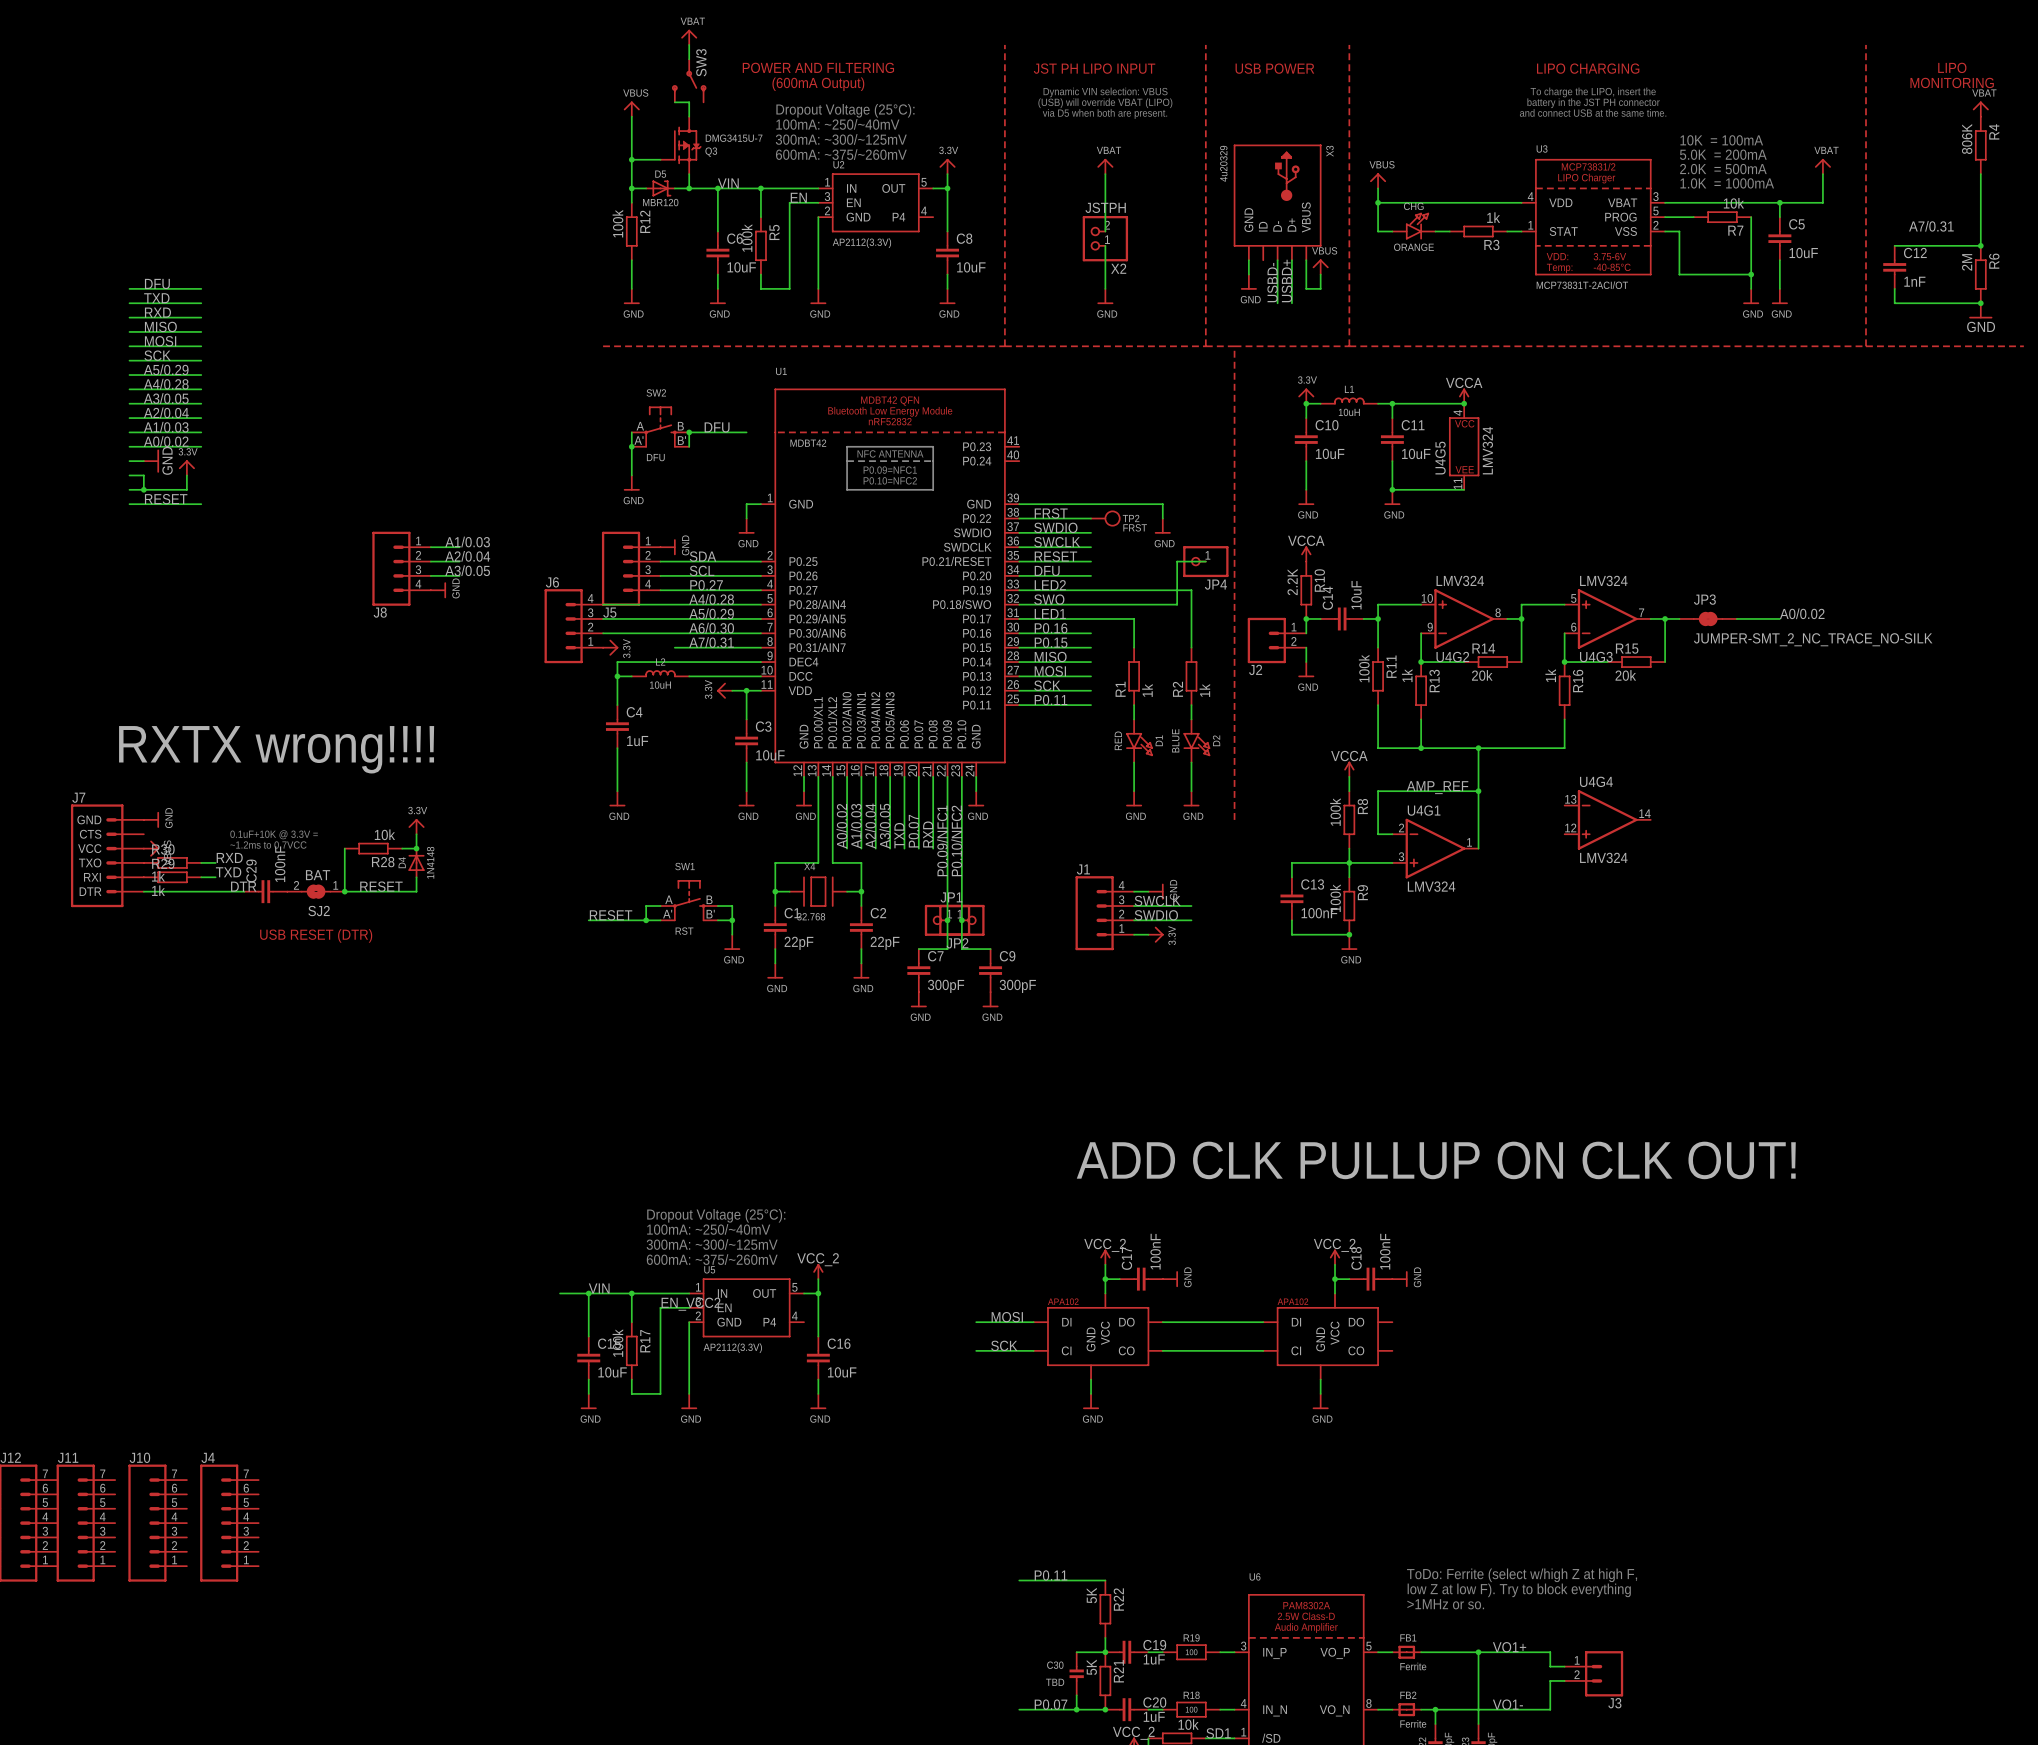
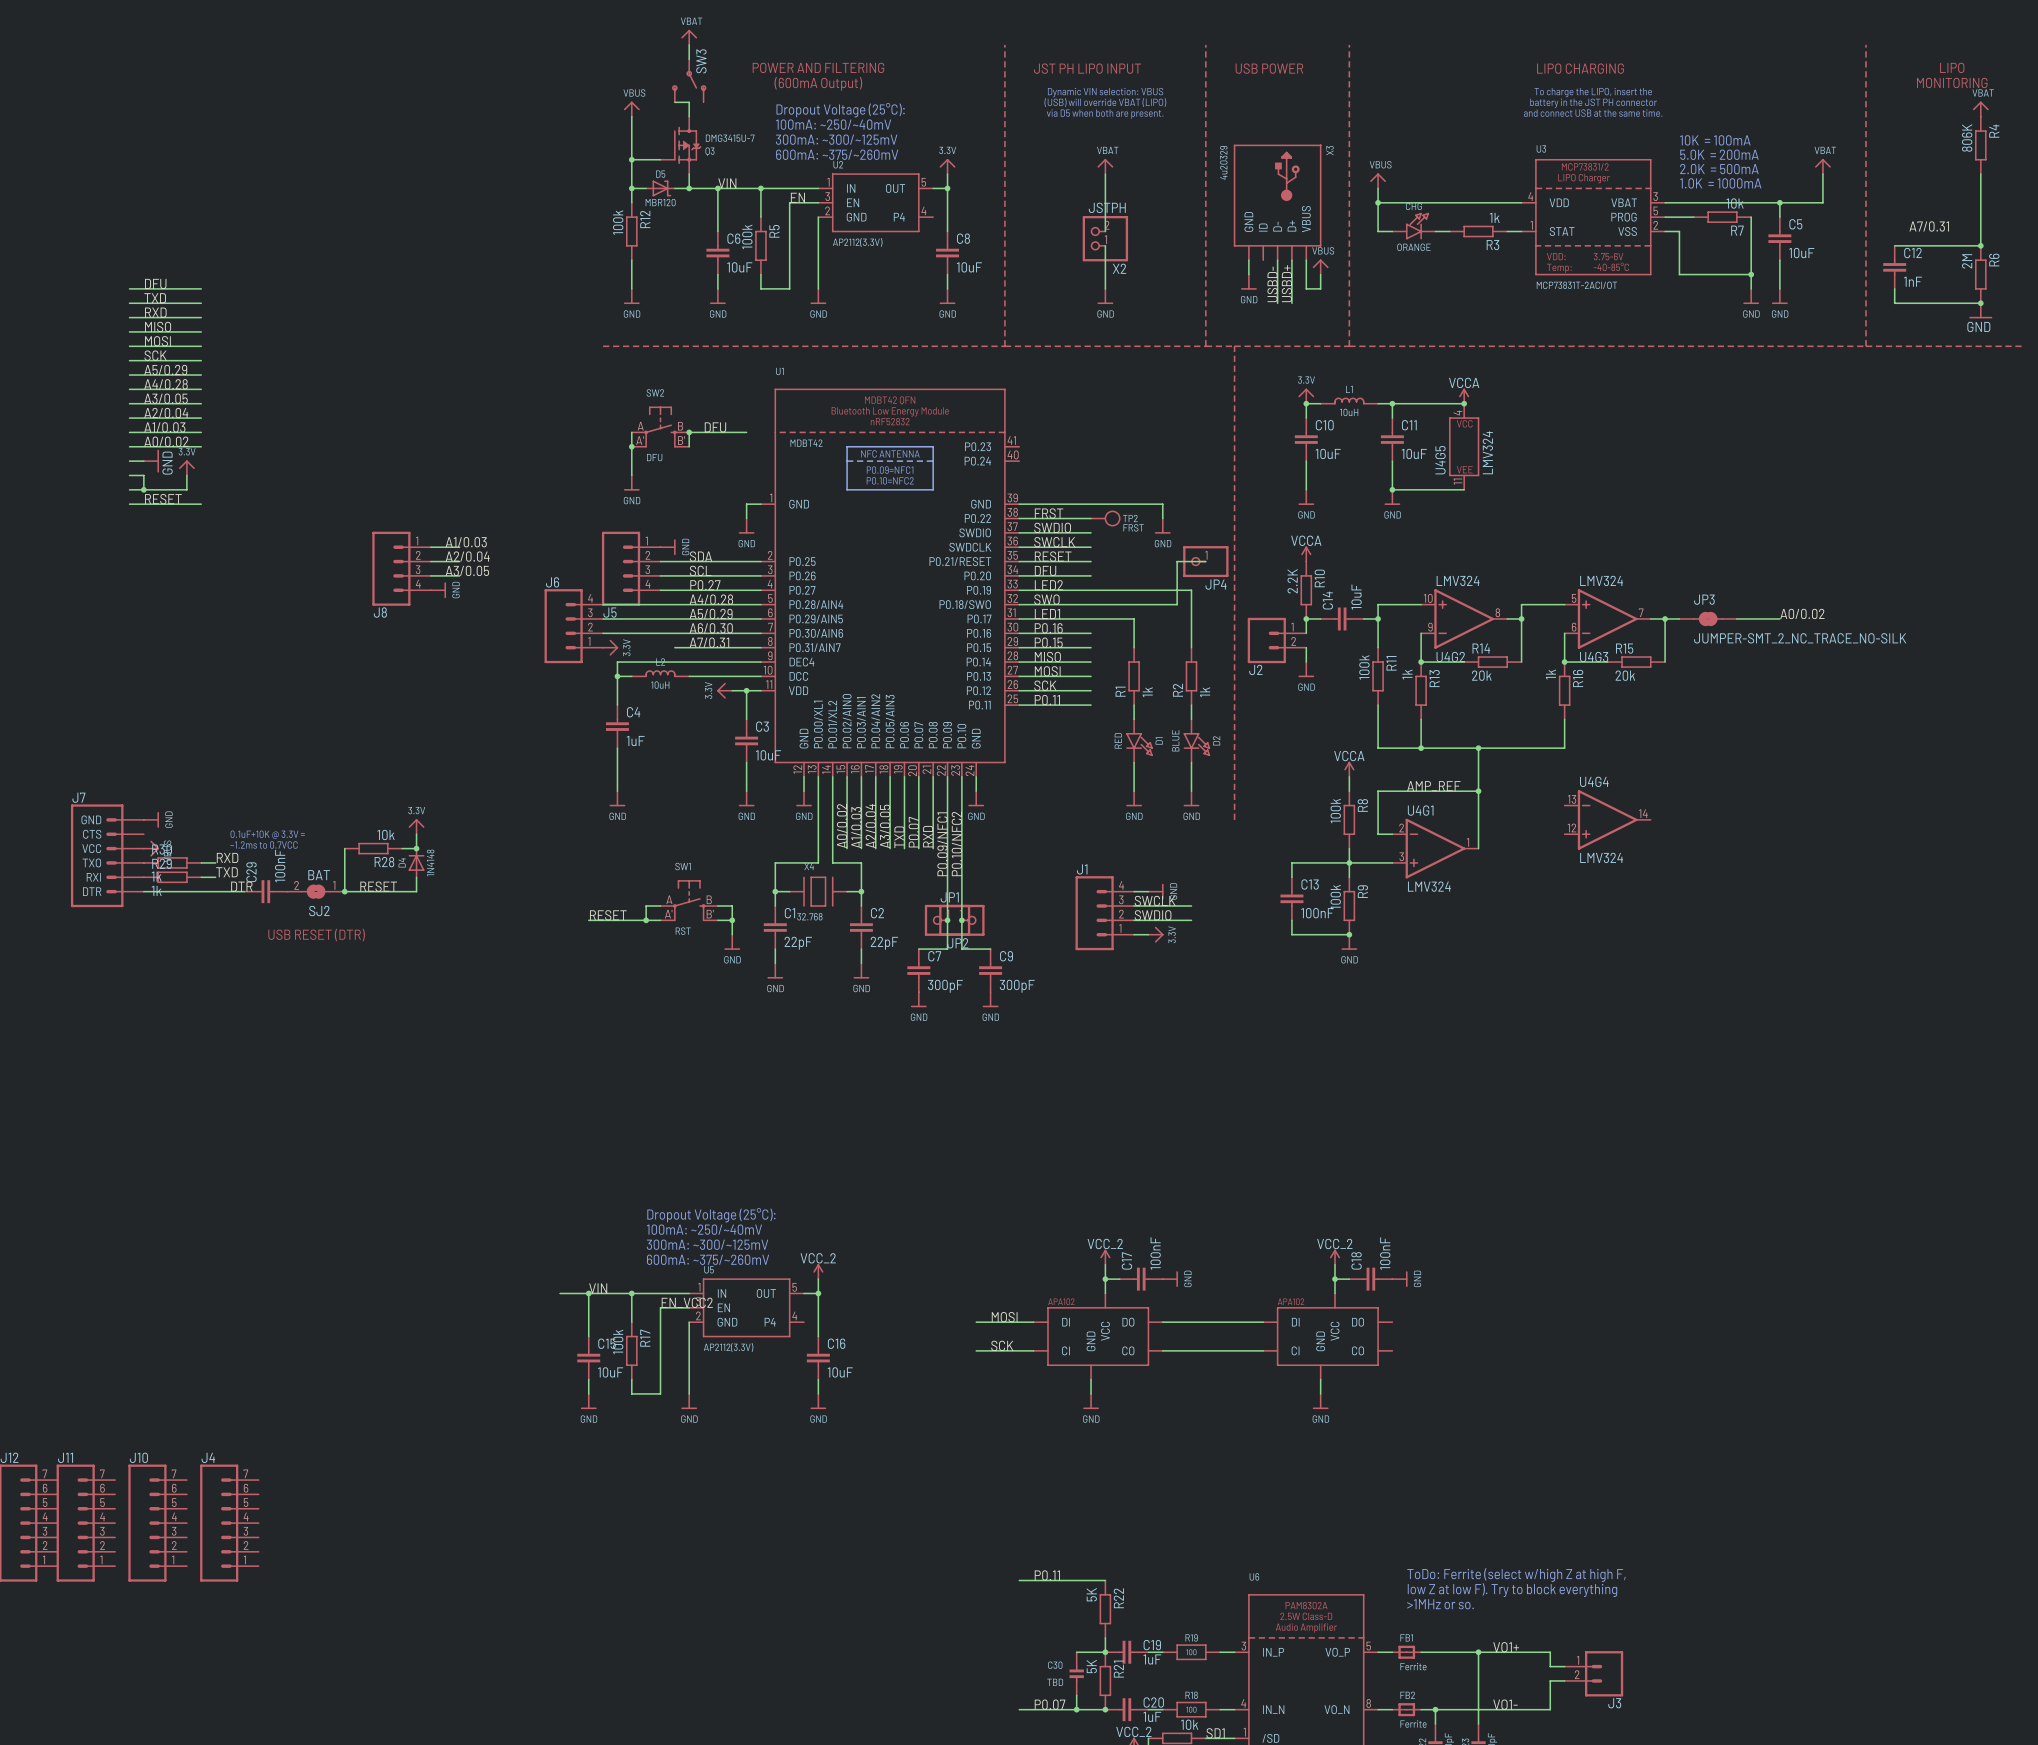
text: RXTX wrong!!!! (276, 749) -> none
text: ADD CLK PULLUP ON CLK OUT! (1436, 1160) -> none

